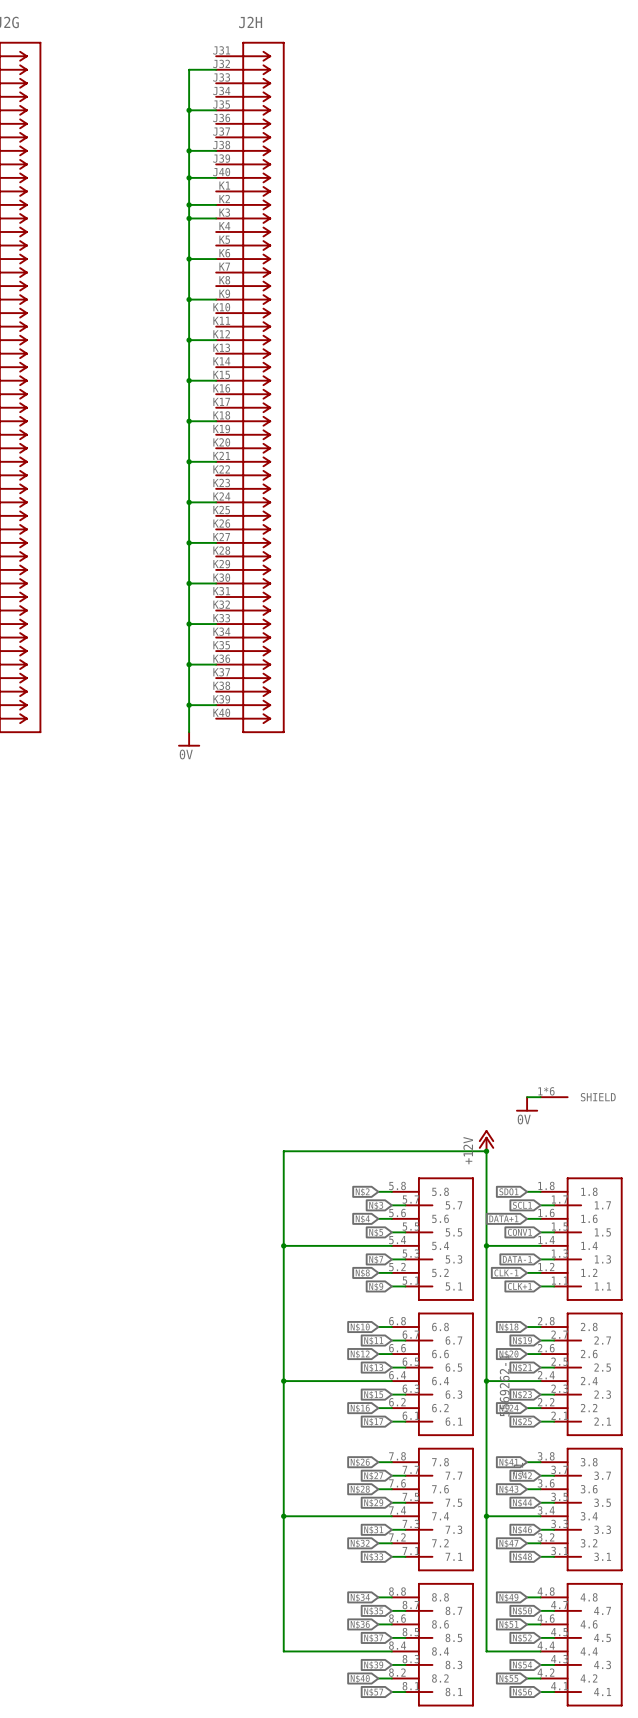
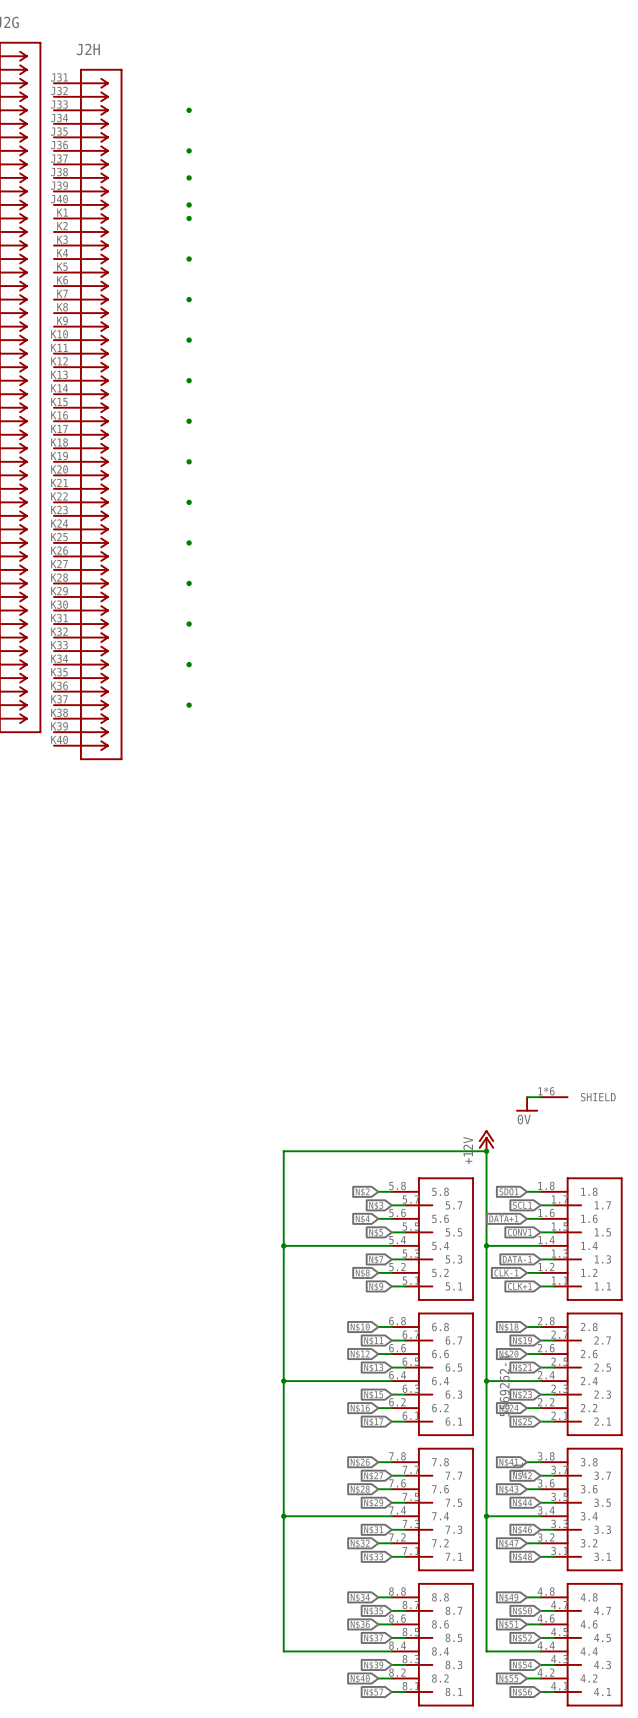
wire: (216, 69) (189, 69) (189, 732) -> none
wire: (189, 110) (216, 110) -> none
wire: (189, 150) (216, 150) -> none
wire: (189, 177) (216, 177) -> none
wire: (189, 204) (216, 204) -> none
wire: (189, 218) (216, 218) -> none
wire: (189, 259) (216, 259) -> none
wire: (189, 299) (216, 299) -> none
wire: (189, 340) (216, 340) -> none
wire: (189, 380) (216, 380) -> none
J2H position: (250, 387) -> (87, 414)
wire: (189, 421) (216, 421) -> none
wire: (189, 461) (216, 461) -> none
wire: (189, 502) (216, 502) -> none
wire: (189, 542) (216, 542) -> none
wire: (189, 583) (216, 583) -> none
wire: (189, 624) (216, 624) -> none
wire: (189, 664) (216, 664) -> none
wire: (189, 705) (216, 705) -> none
power symbol: 0V (189, 739) -> none

